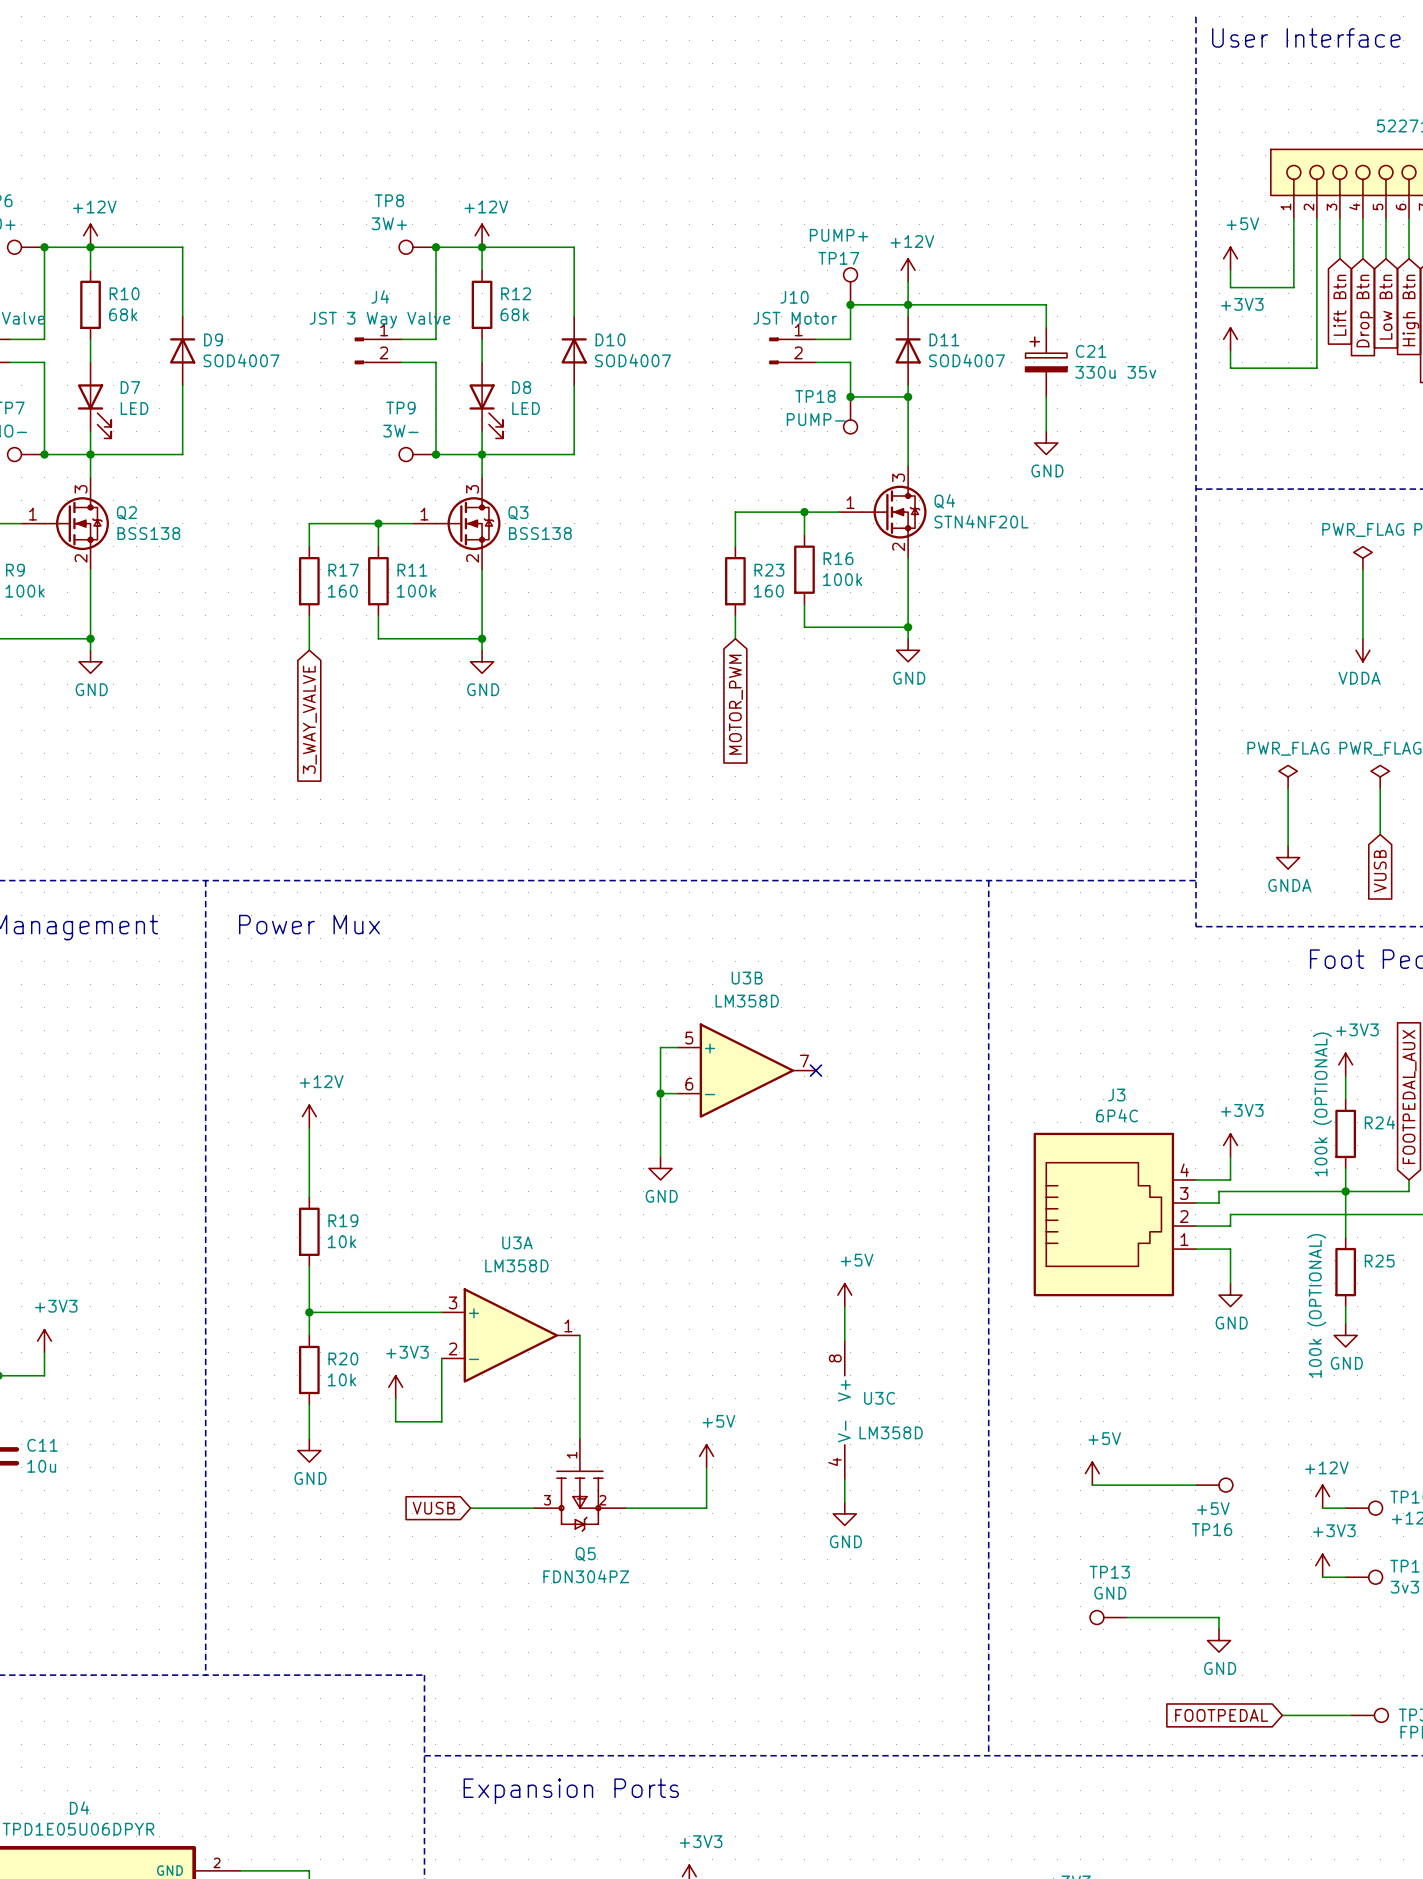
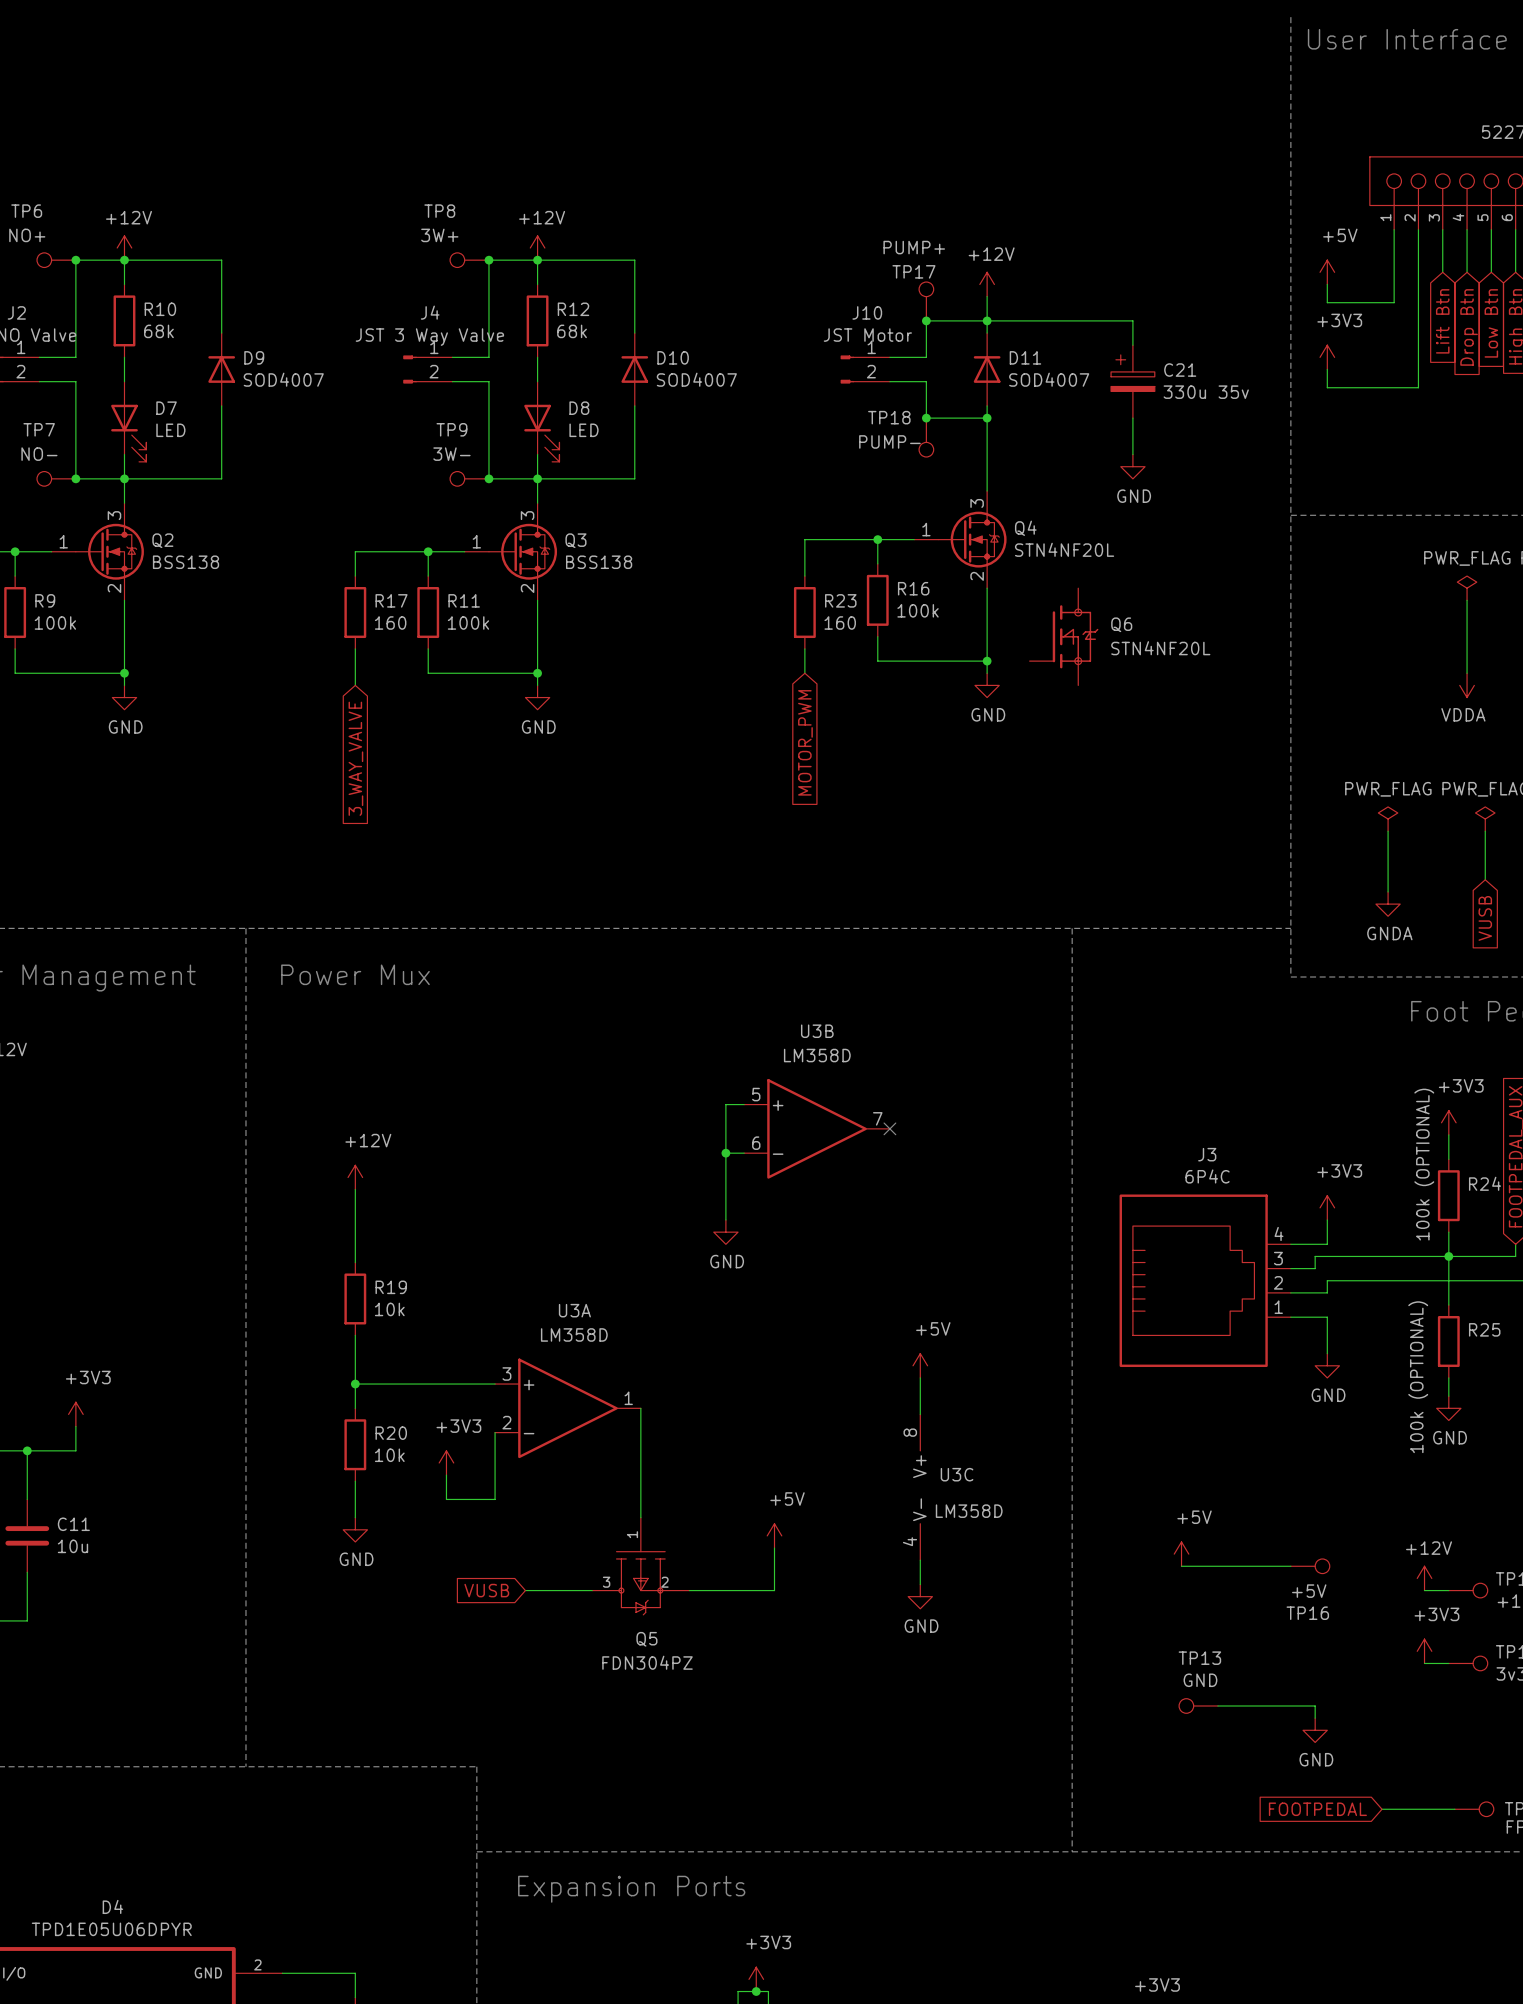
Q6: none -> STN4NF20L (1064, 636)

